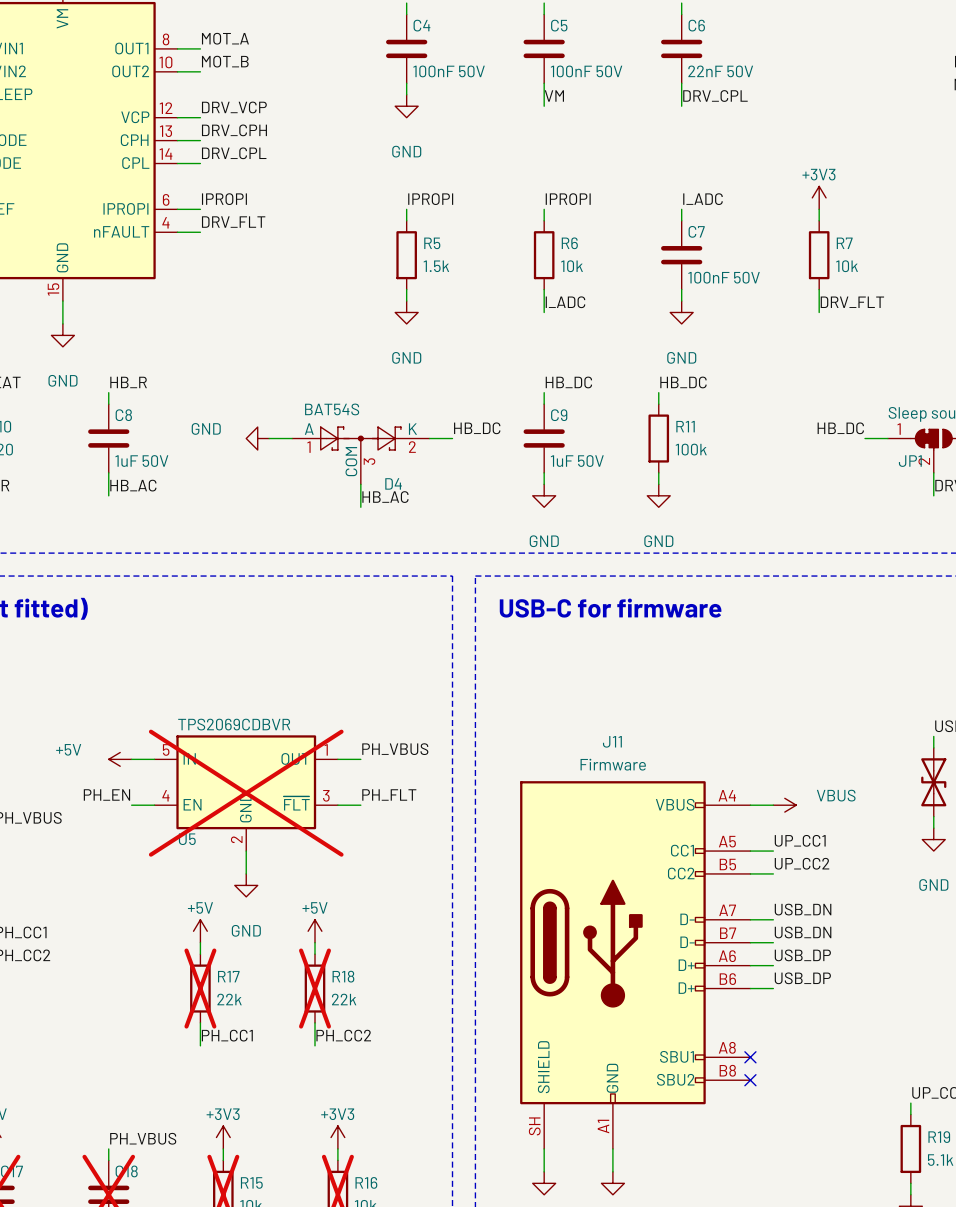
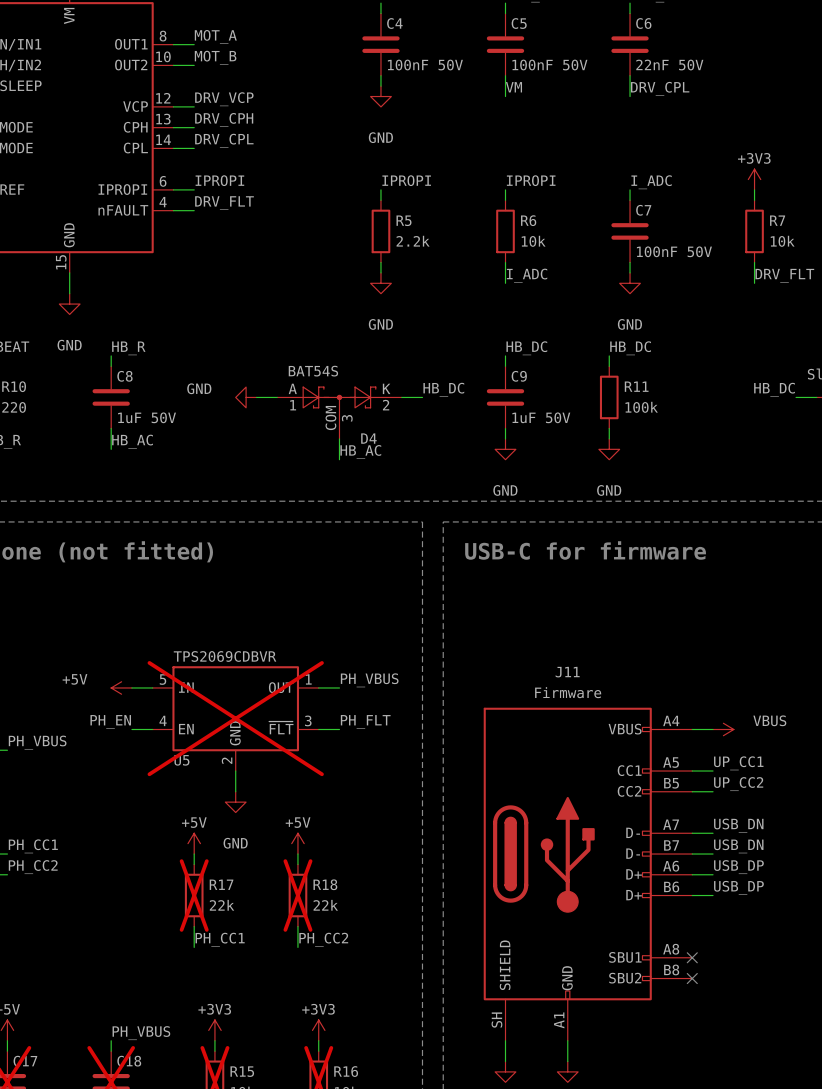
R5 value: 1.5k (436, 266) -> 2.2k (413, 241)

